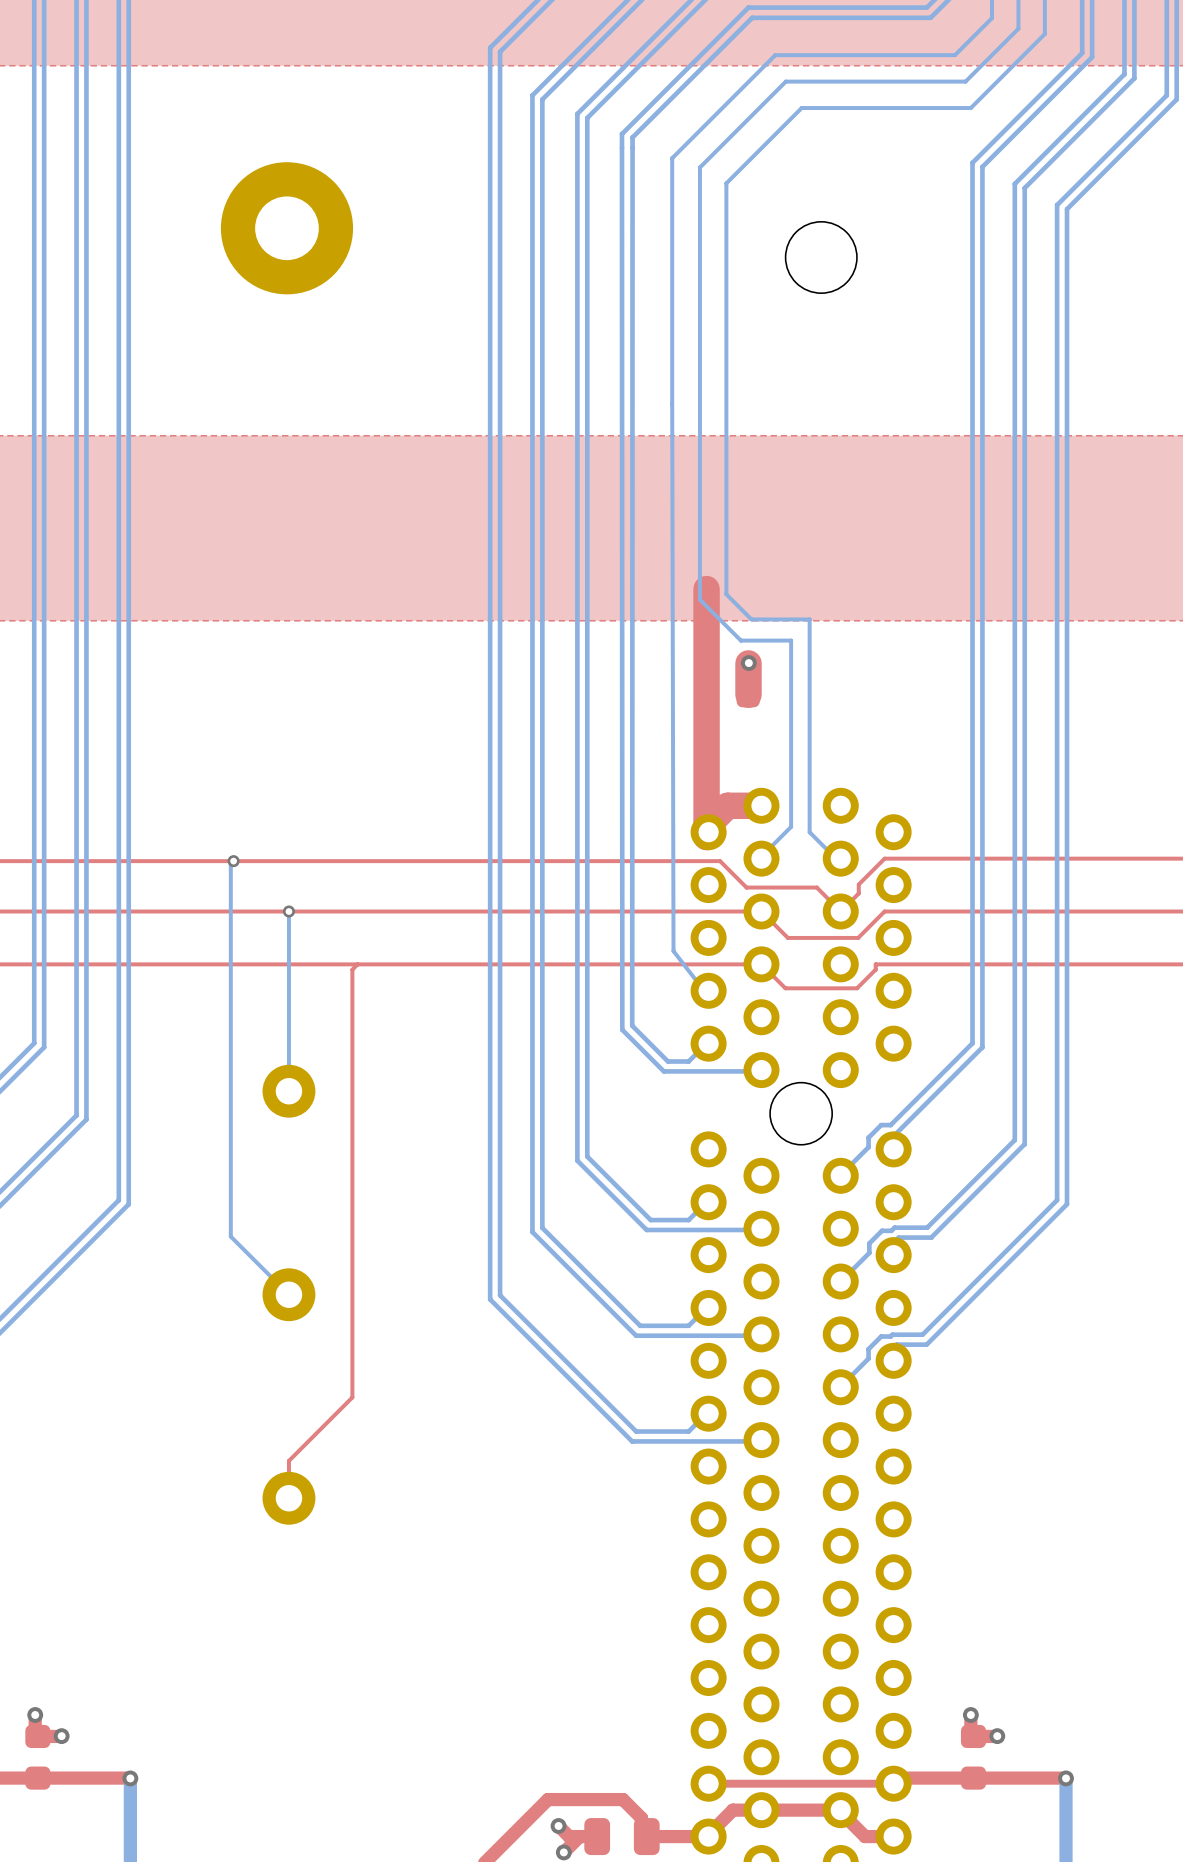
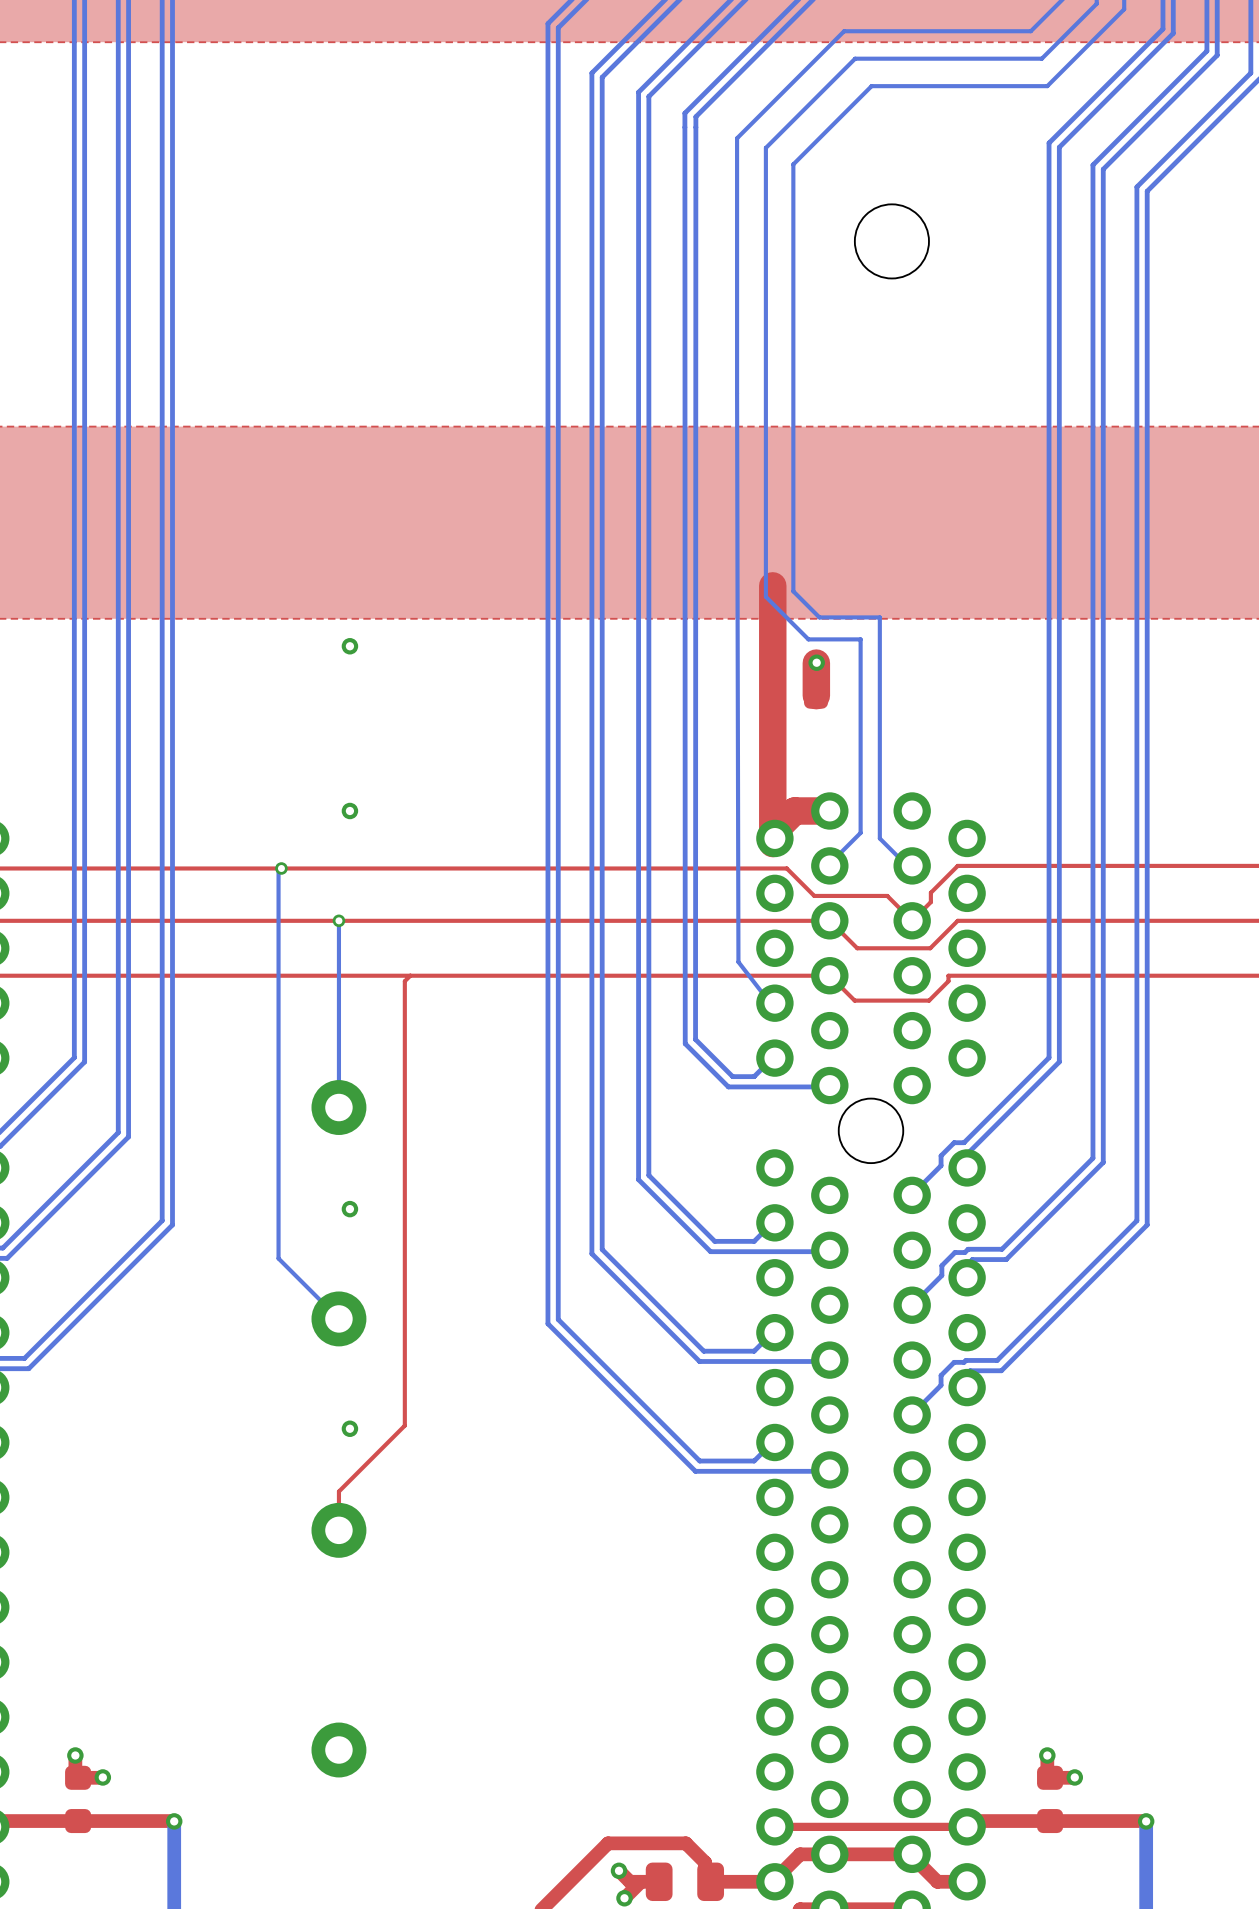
part: (286, 228) -> none
via: none -> (349, 646)
via: none -> (349, 810)
via: none -> (349, 1209)
via: none -> (349, 1428)
part: none -> (338, 1750)

